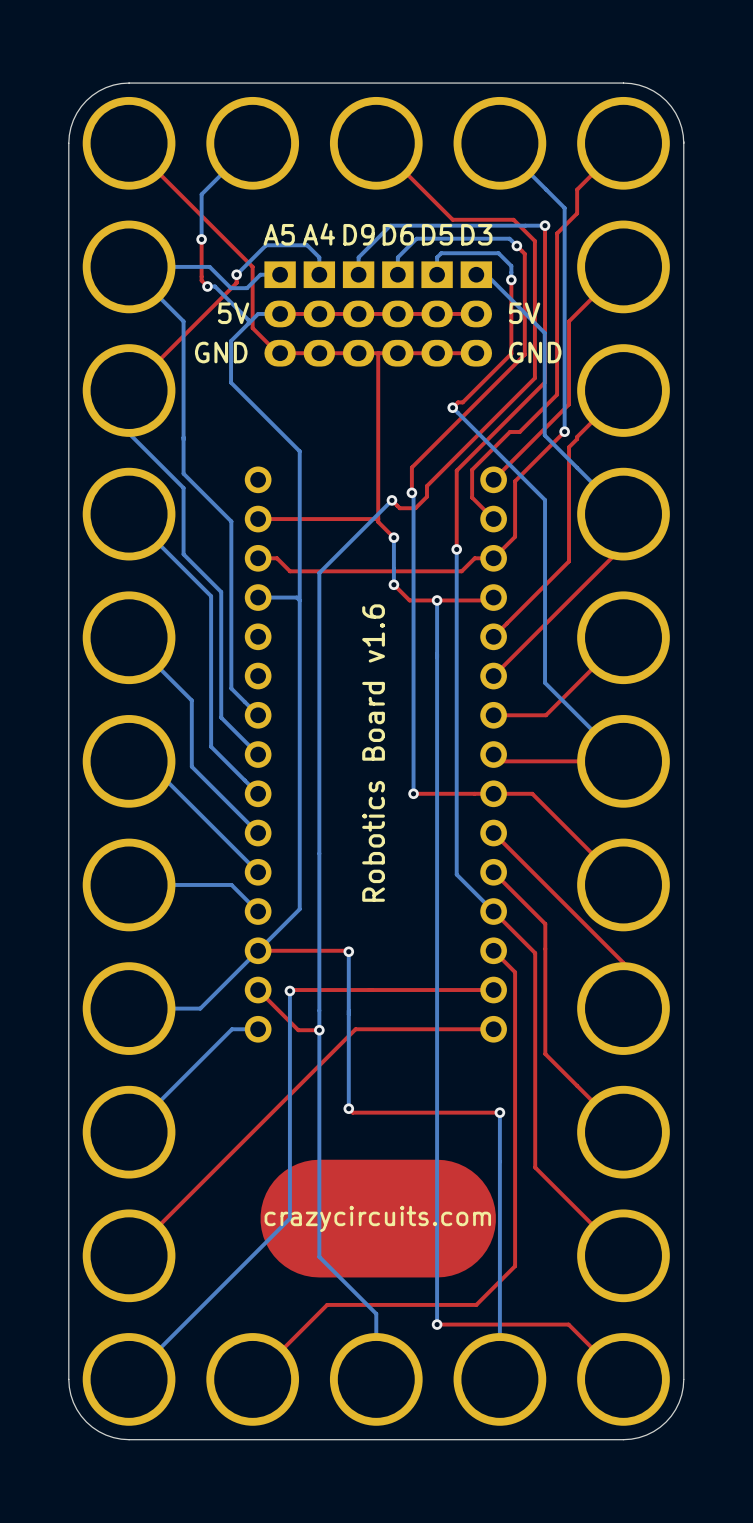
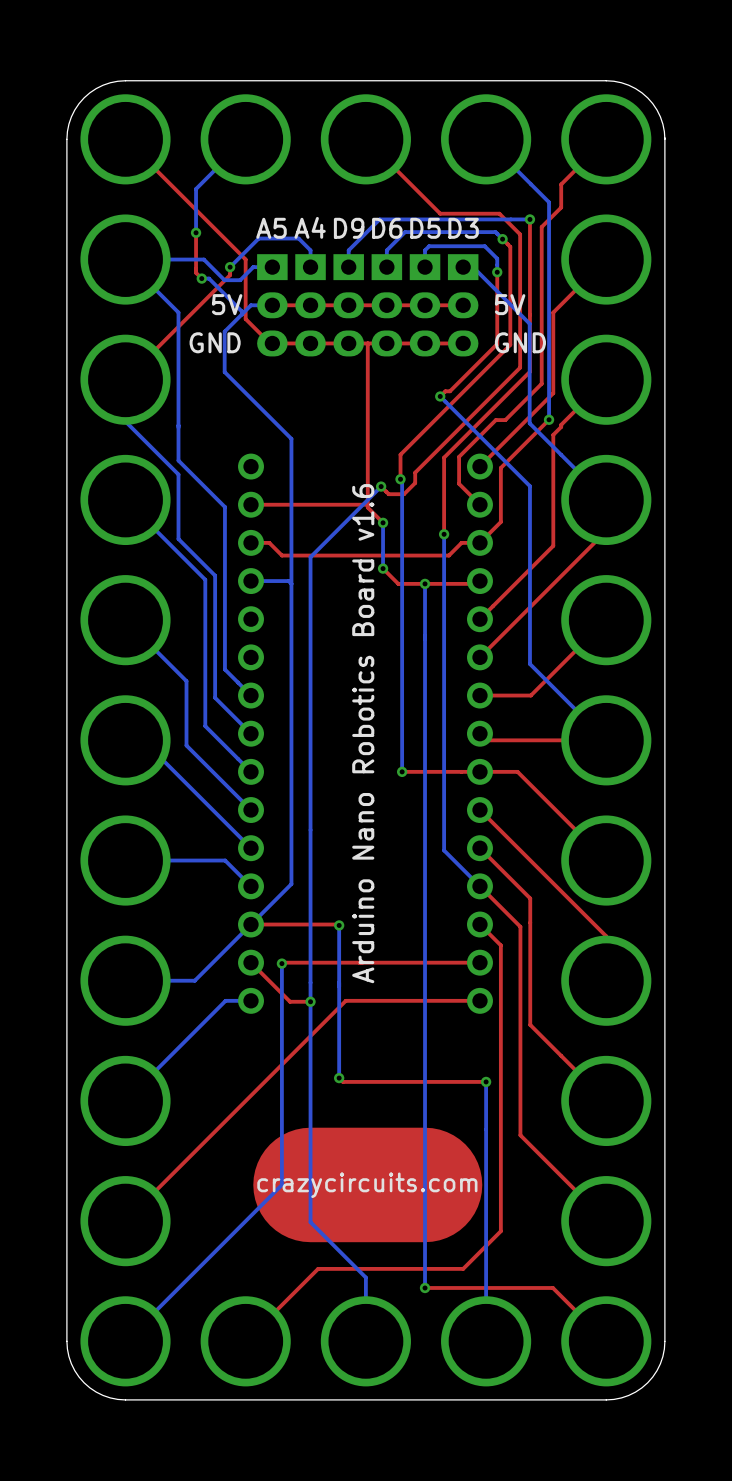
text: Robotics Board v1.6 (373, 753) -> Arduino Nano Robotics Board v1.6 (363, 733)

